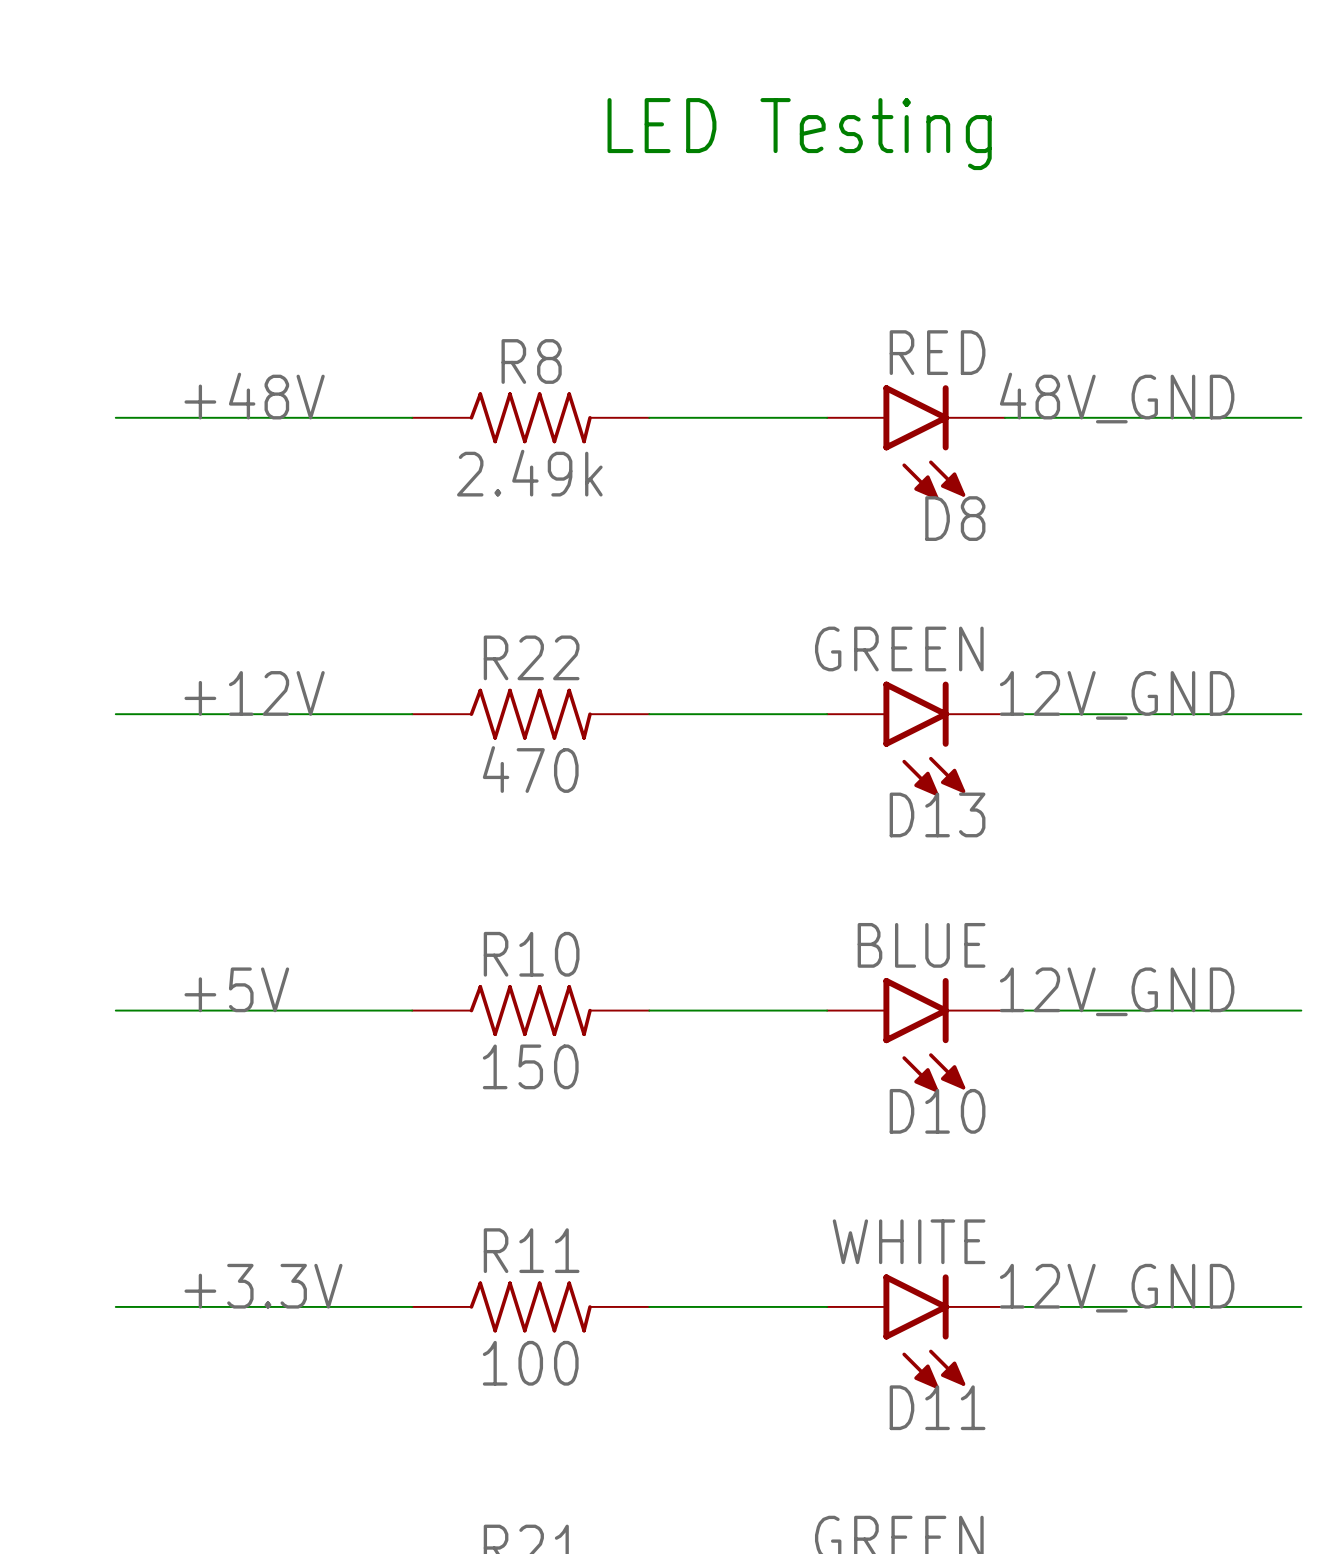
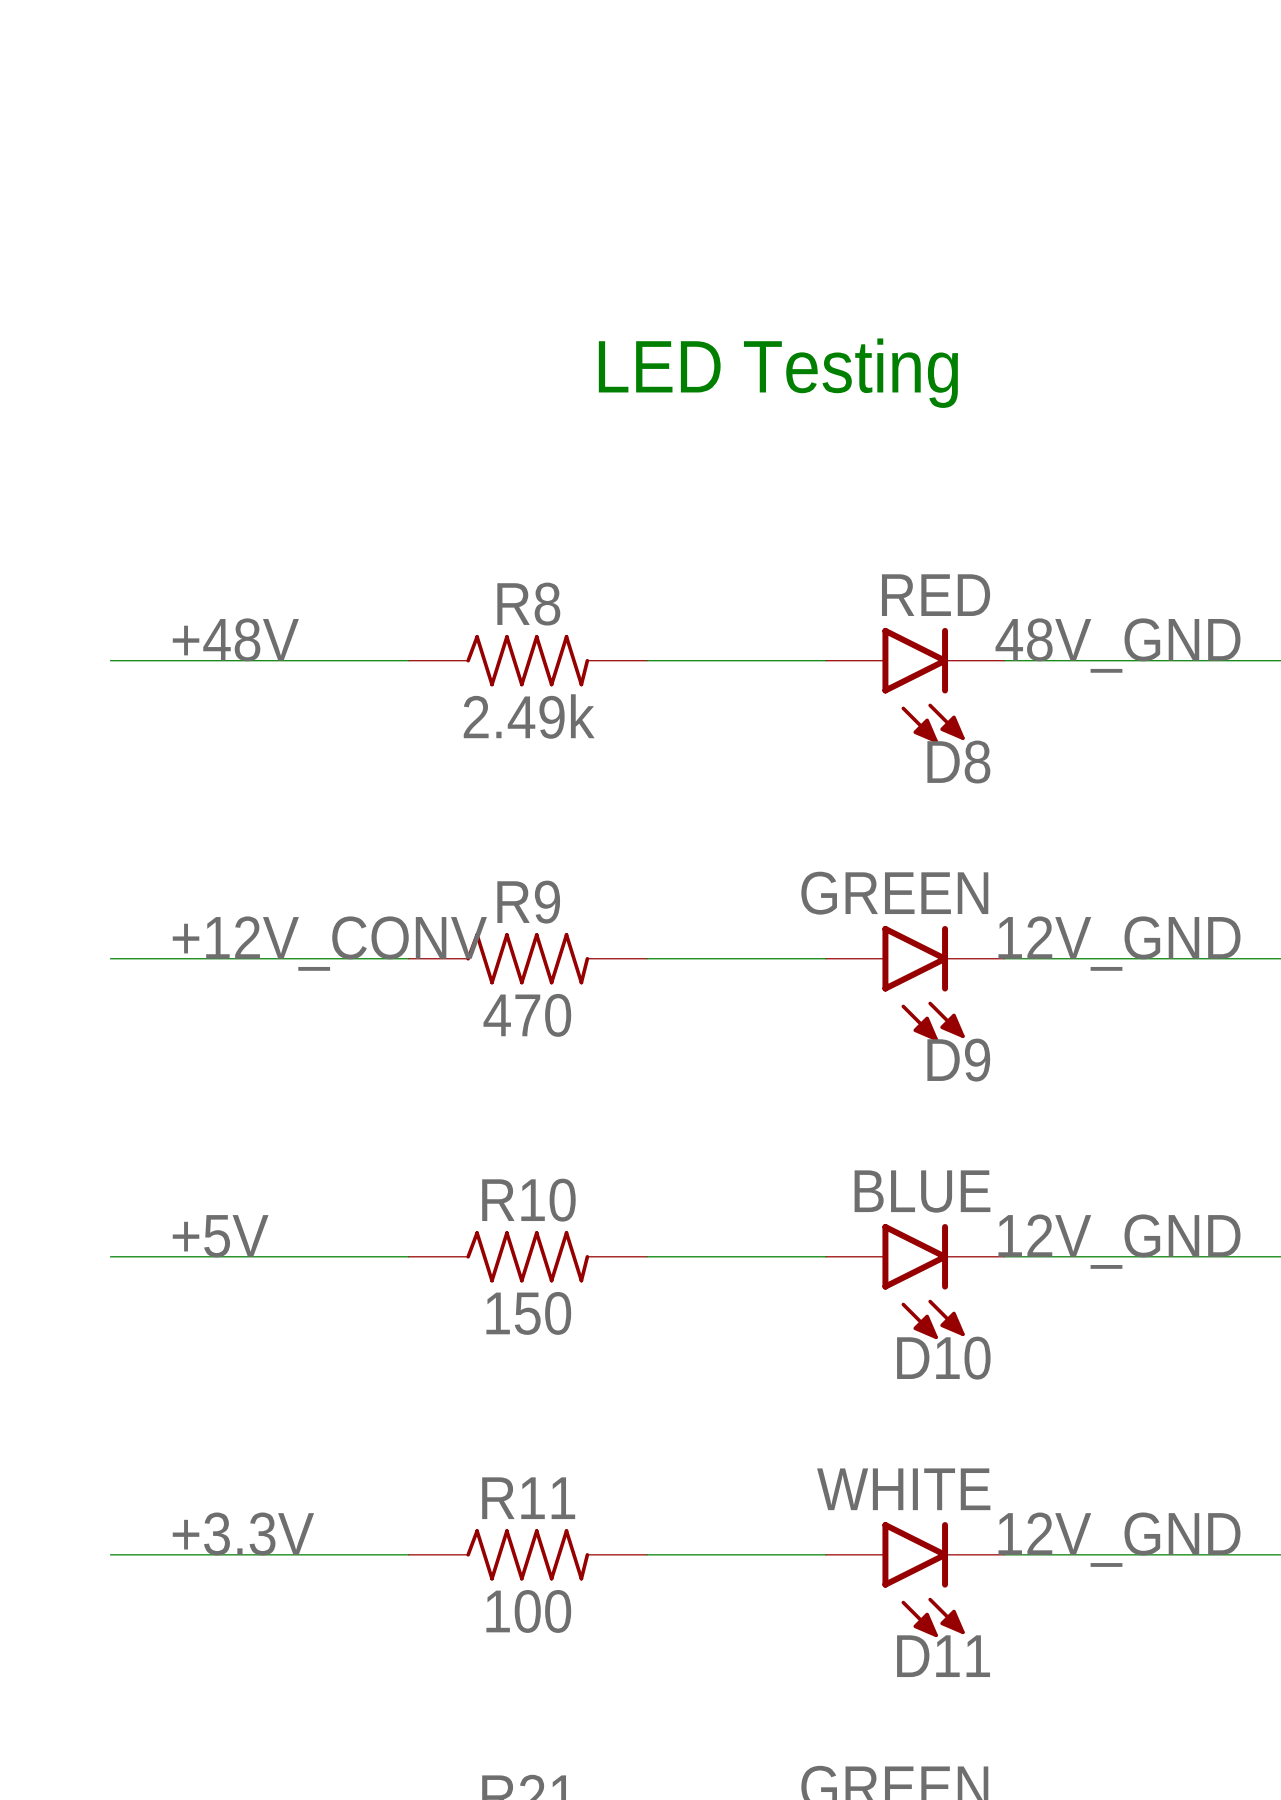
R22 name: R22 (531, 657) -> R9 (528, 902)
label: +12V (254, 693) -> +12V_CONV (329, 943)
D13 name: D13 (937, 814) -> D9 (958, 1060)

